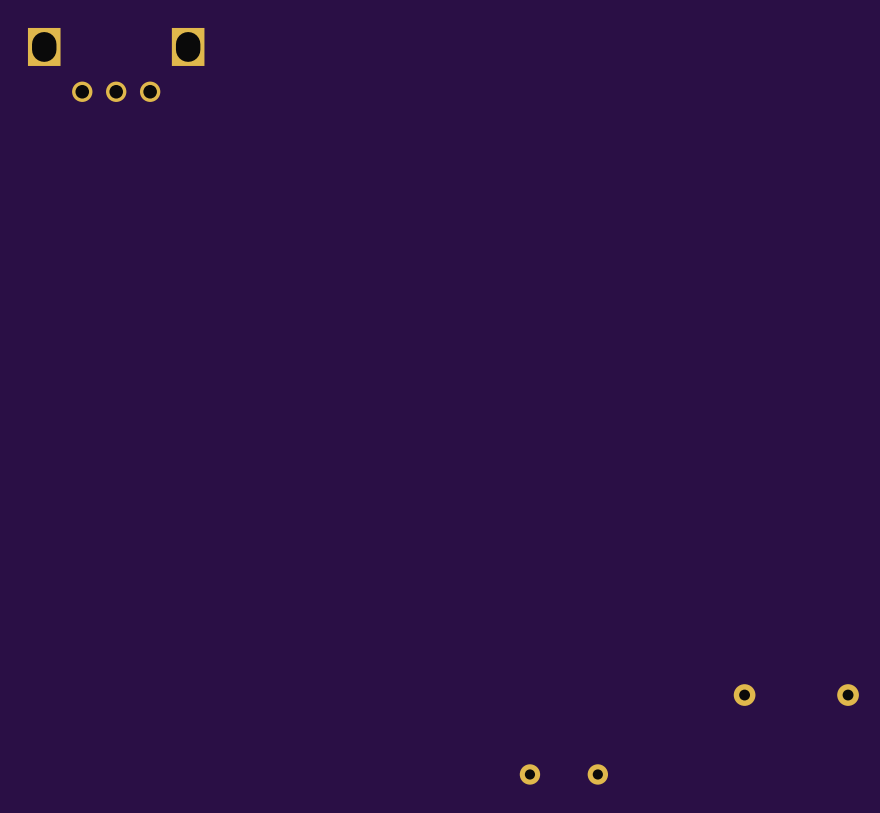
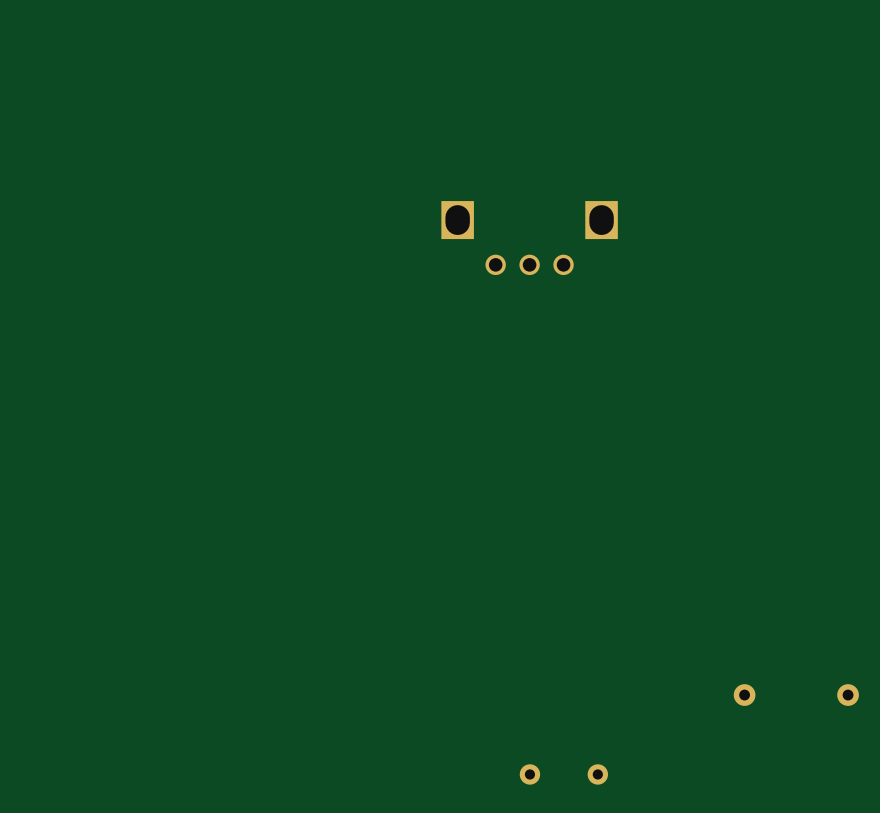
part: (116, 64) -> none
part: none -> (529, 238)

